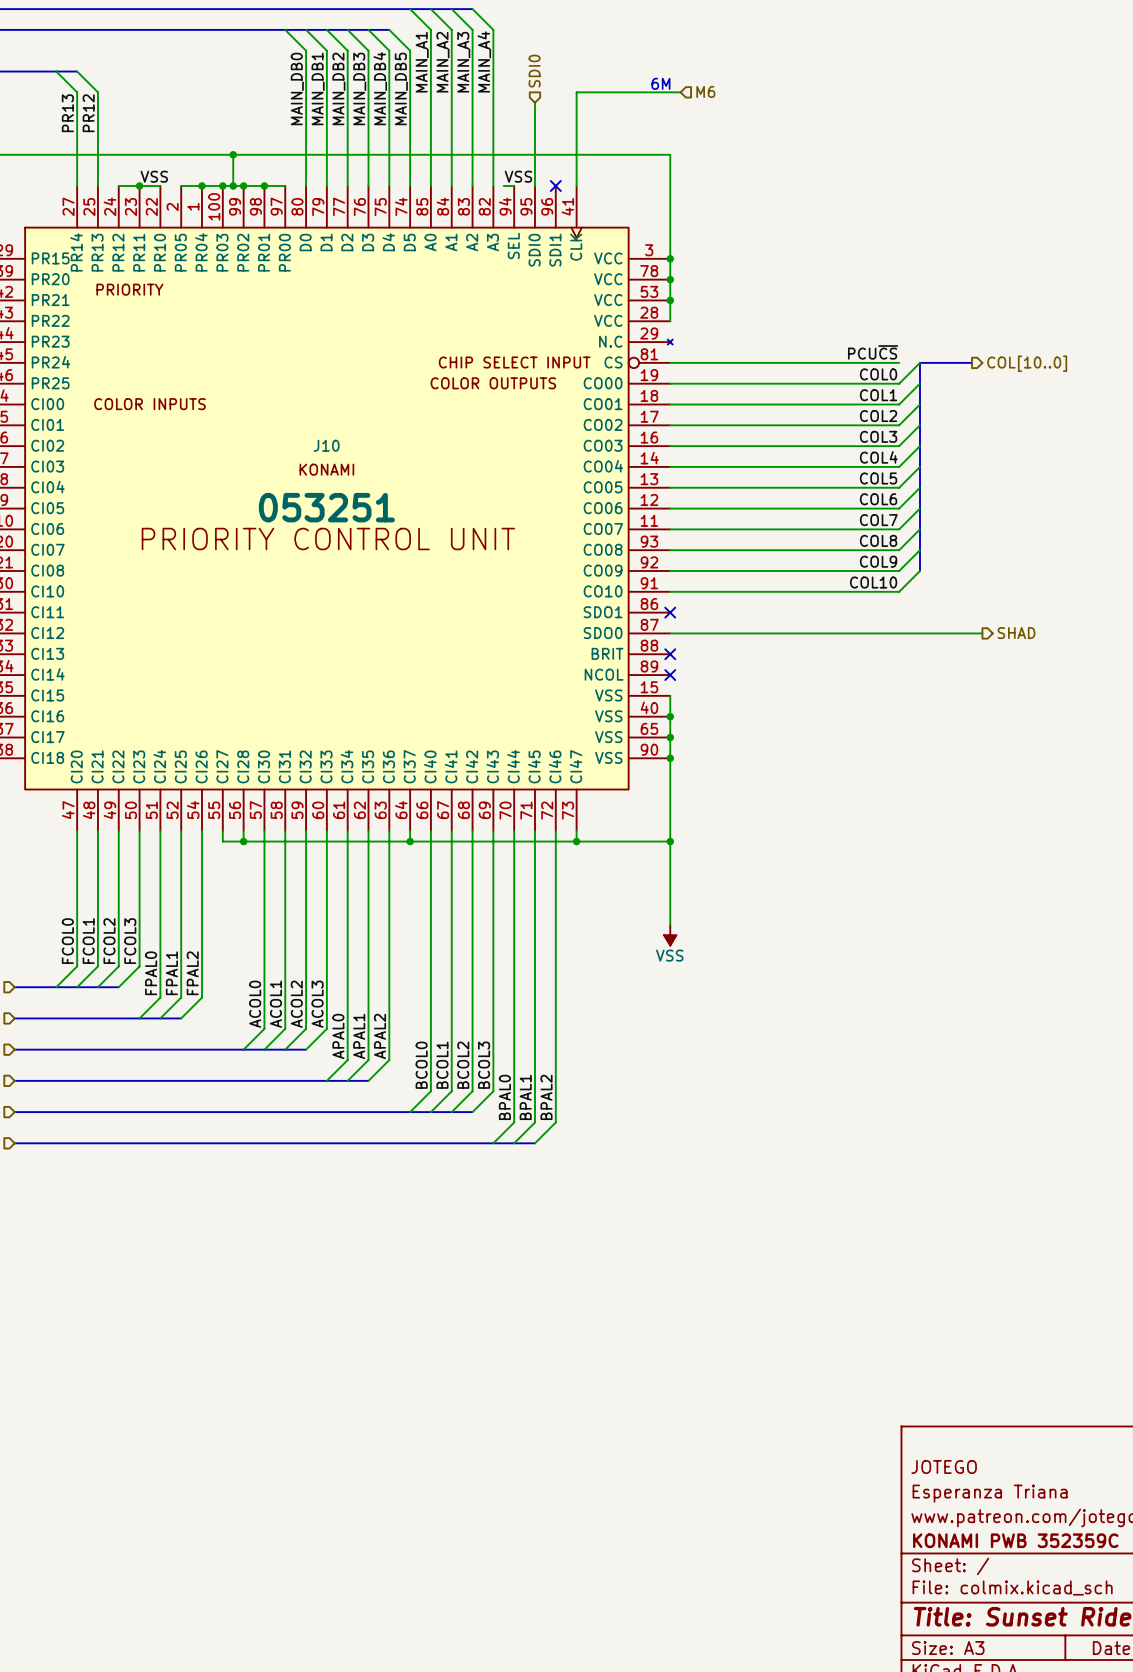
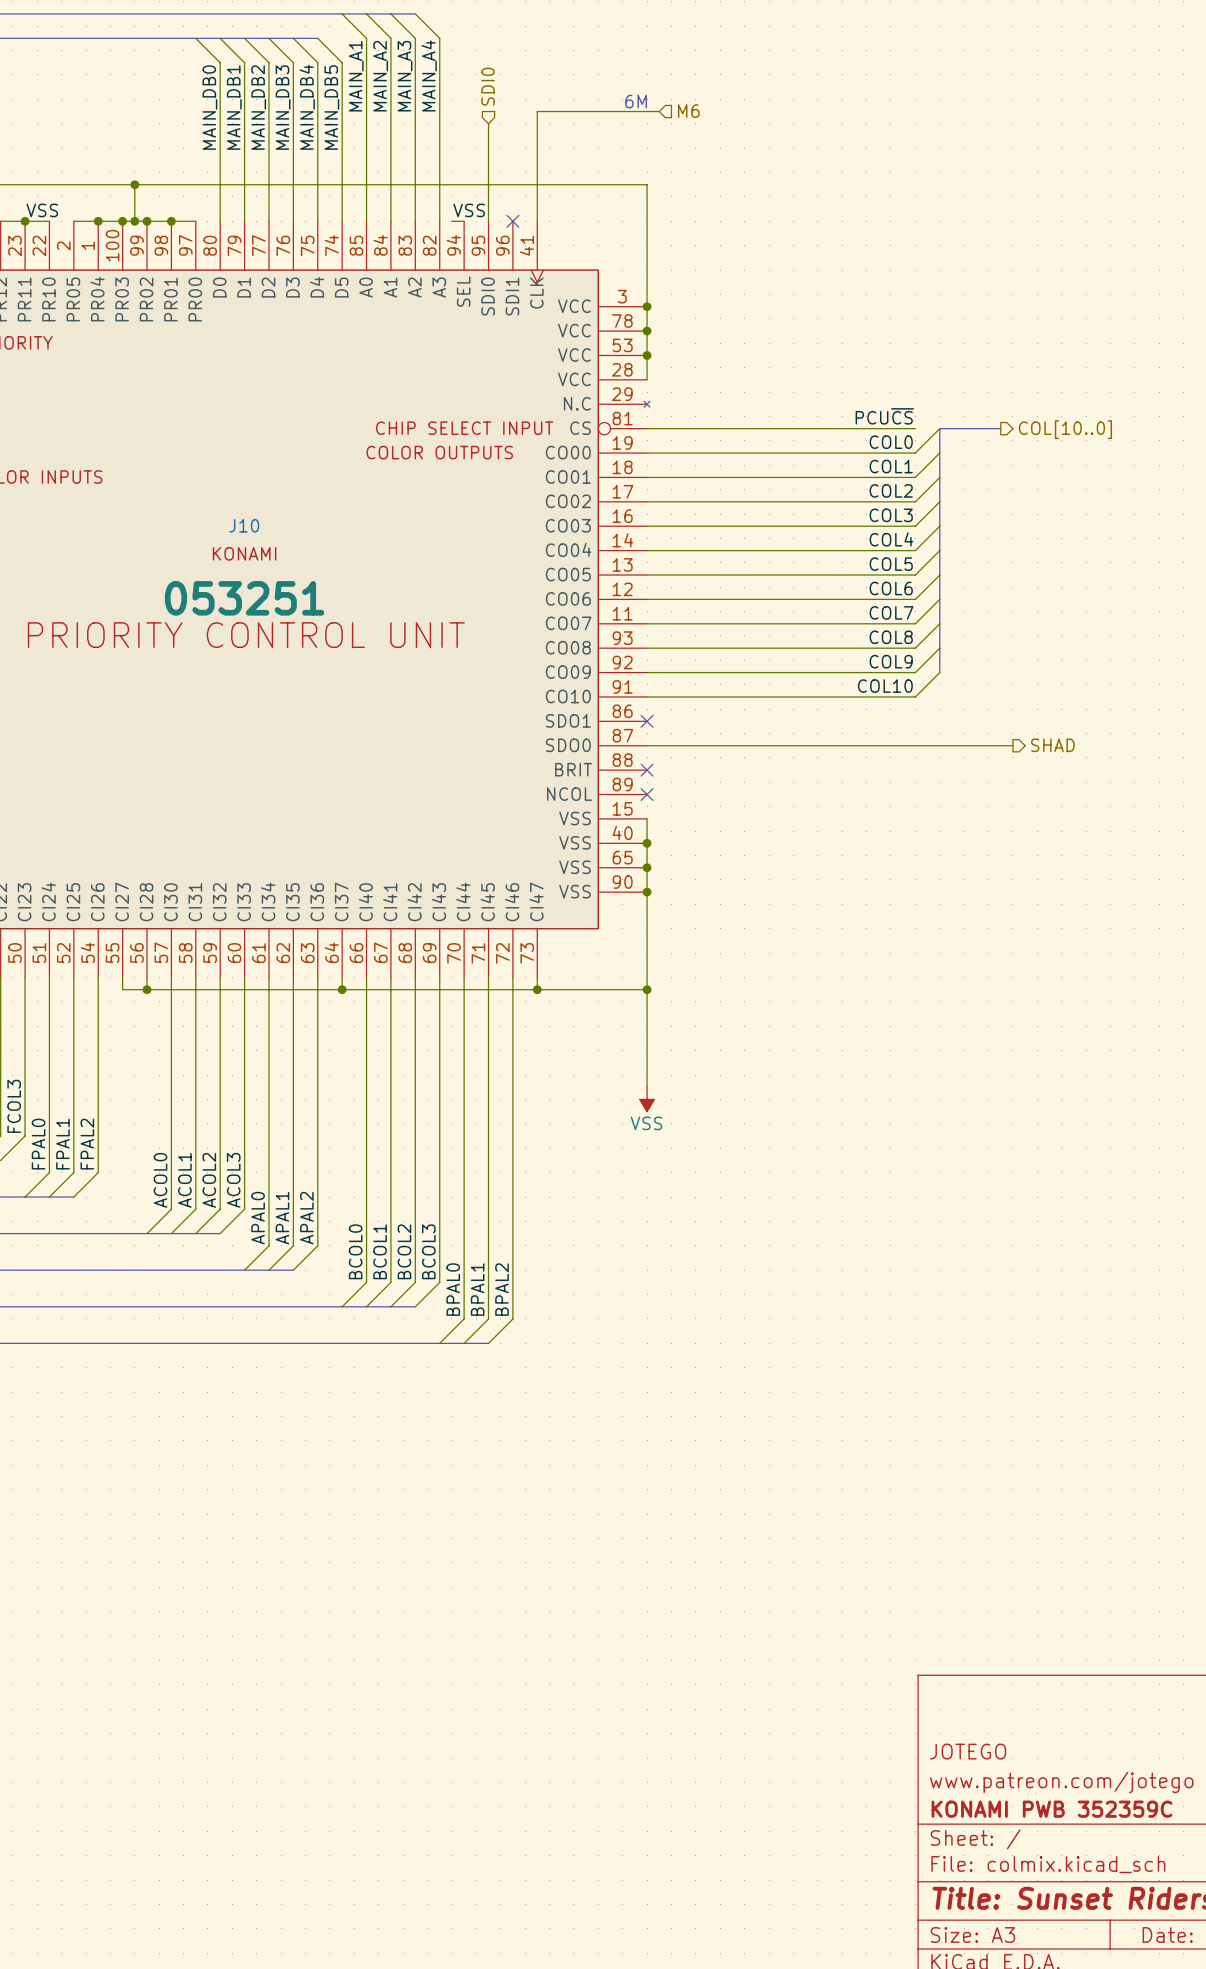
title block: JOTEGO (944, 1466) -> none
title block: Esperanza Triana (990, 1493) -> JOTEGO (968, 1751)

